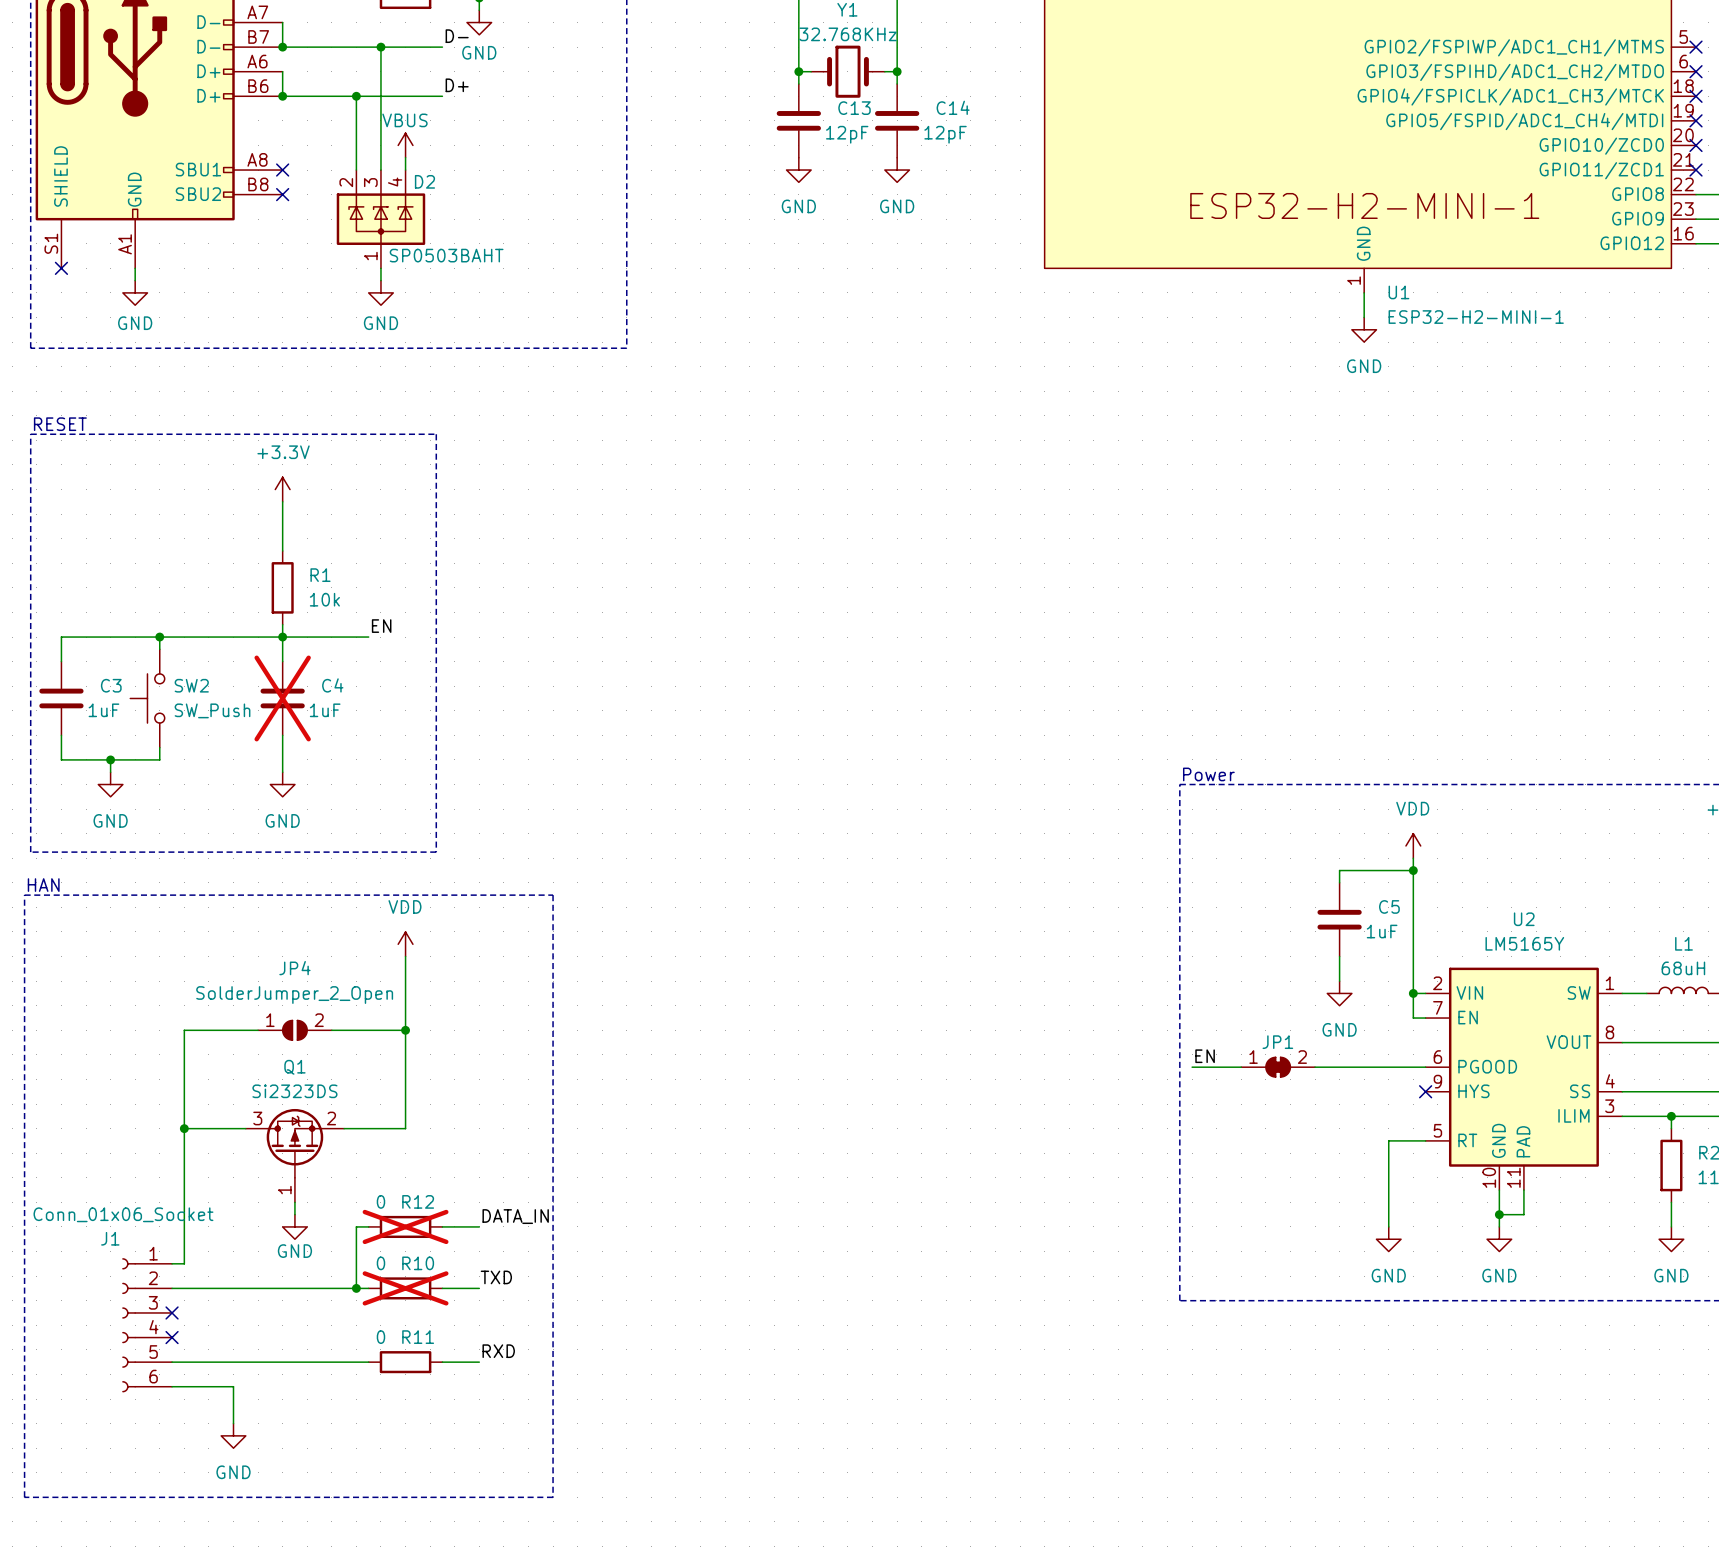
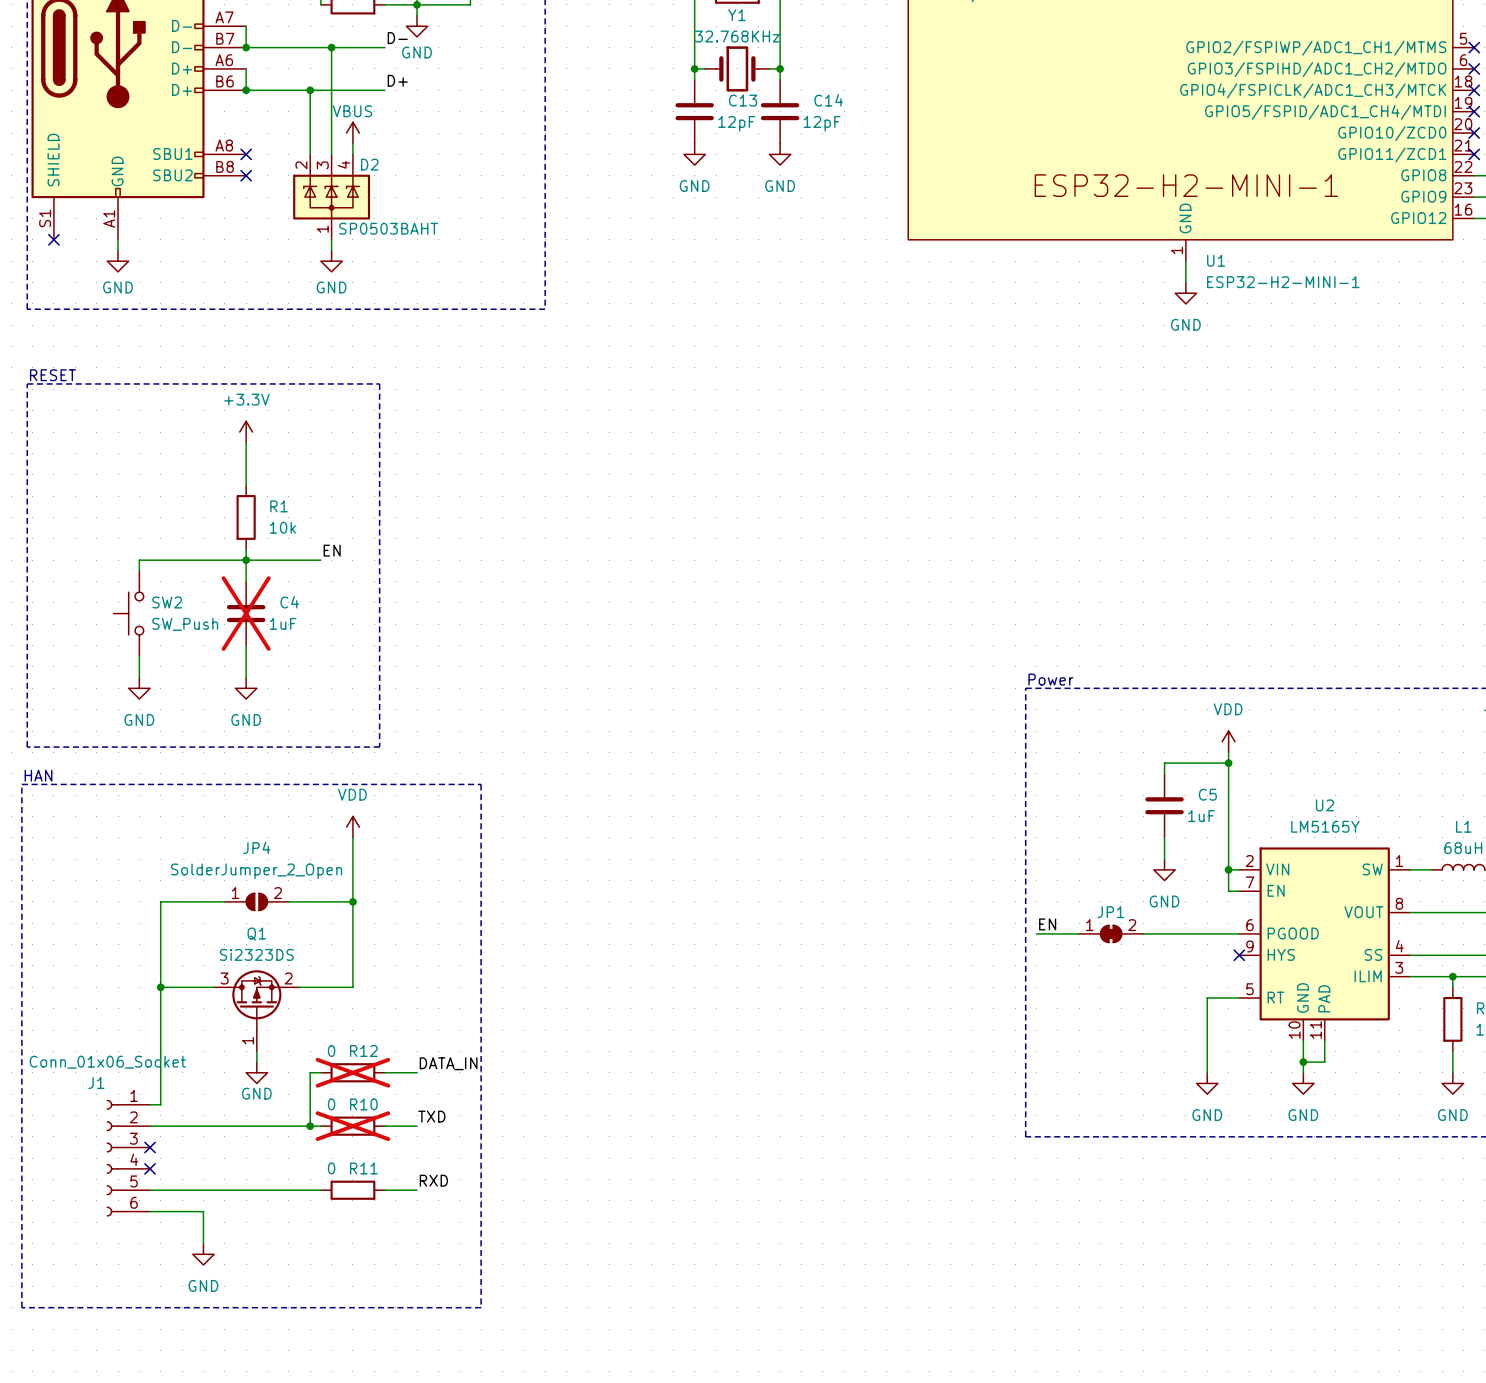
wire: (159, 637) (61, 637) (61, 661) -> none
junction: (159, 637) -> none
C3: 1uF (61, 698) -> none
wire: (61, 735) (61, 759) (159, 759) -> (139, 677) (139, 666)
wire: (110, 759) (110, 772) -> none
junction: (110, 759) -> none
power symbol position: GND (110, 784) -> GND (139, 688)

